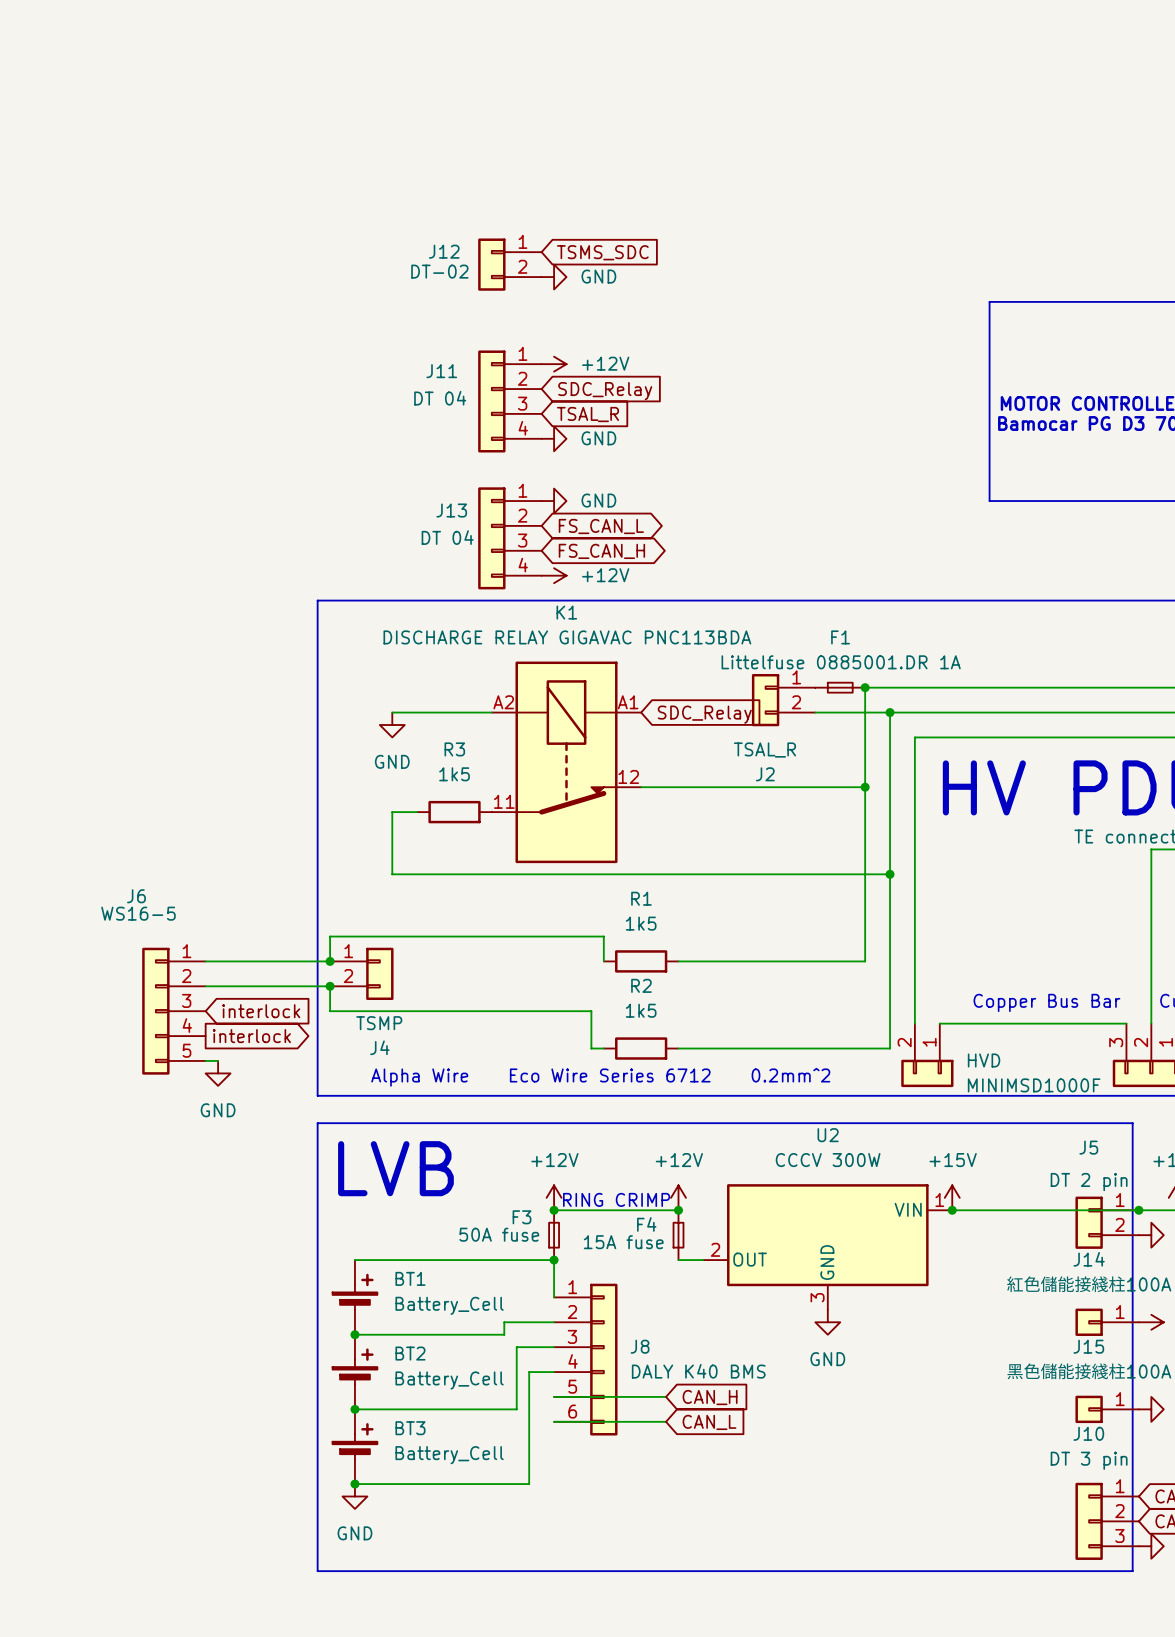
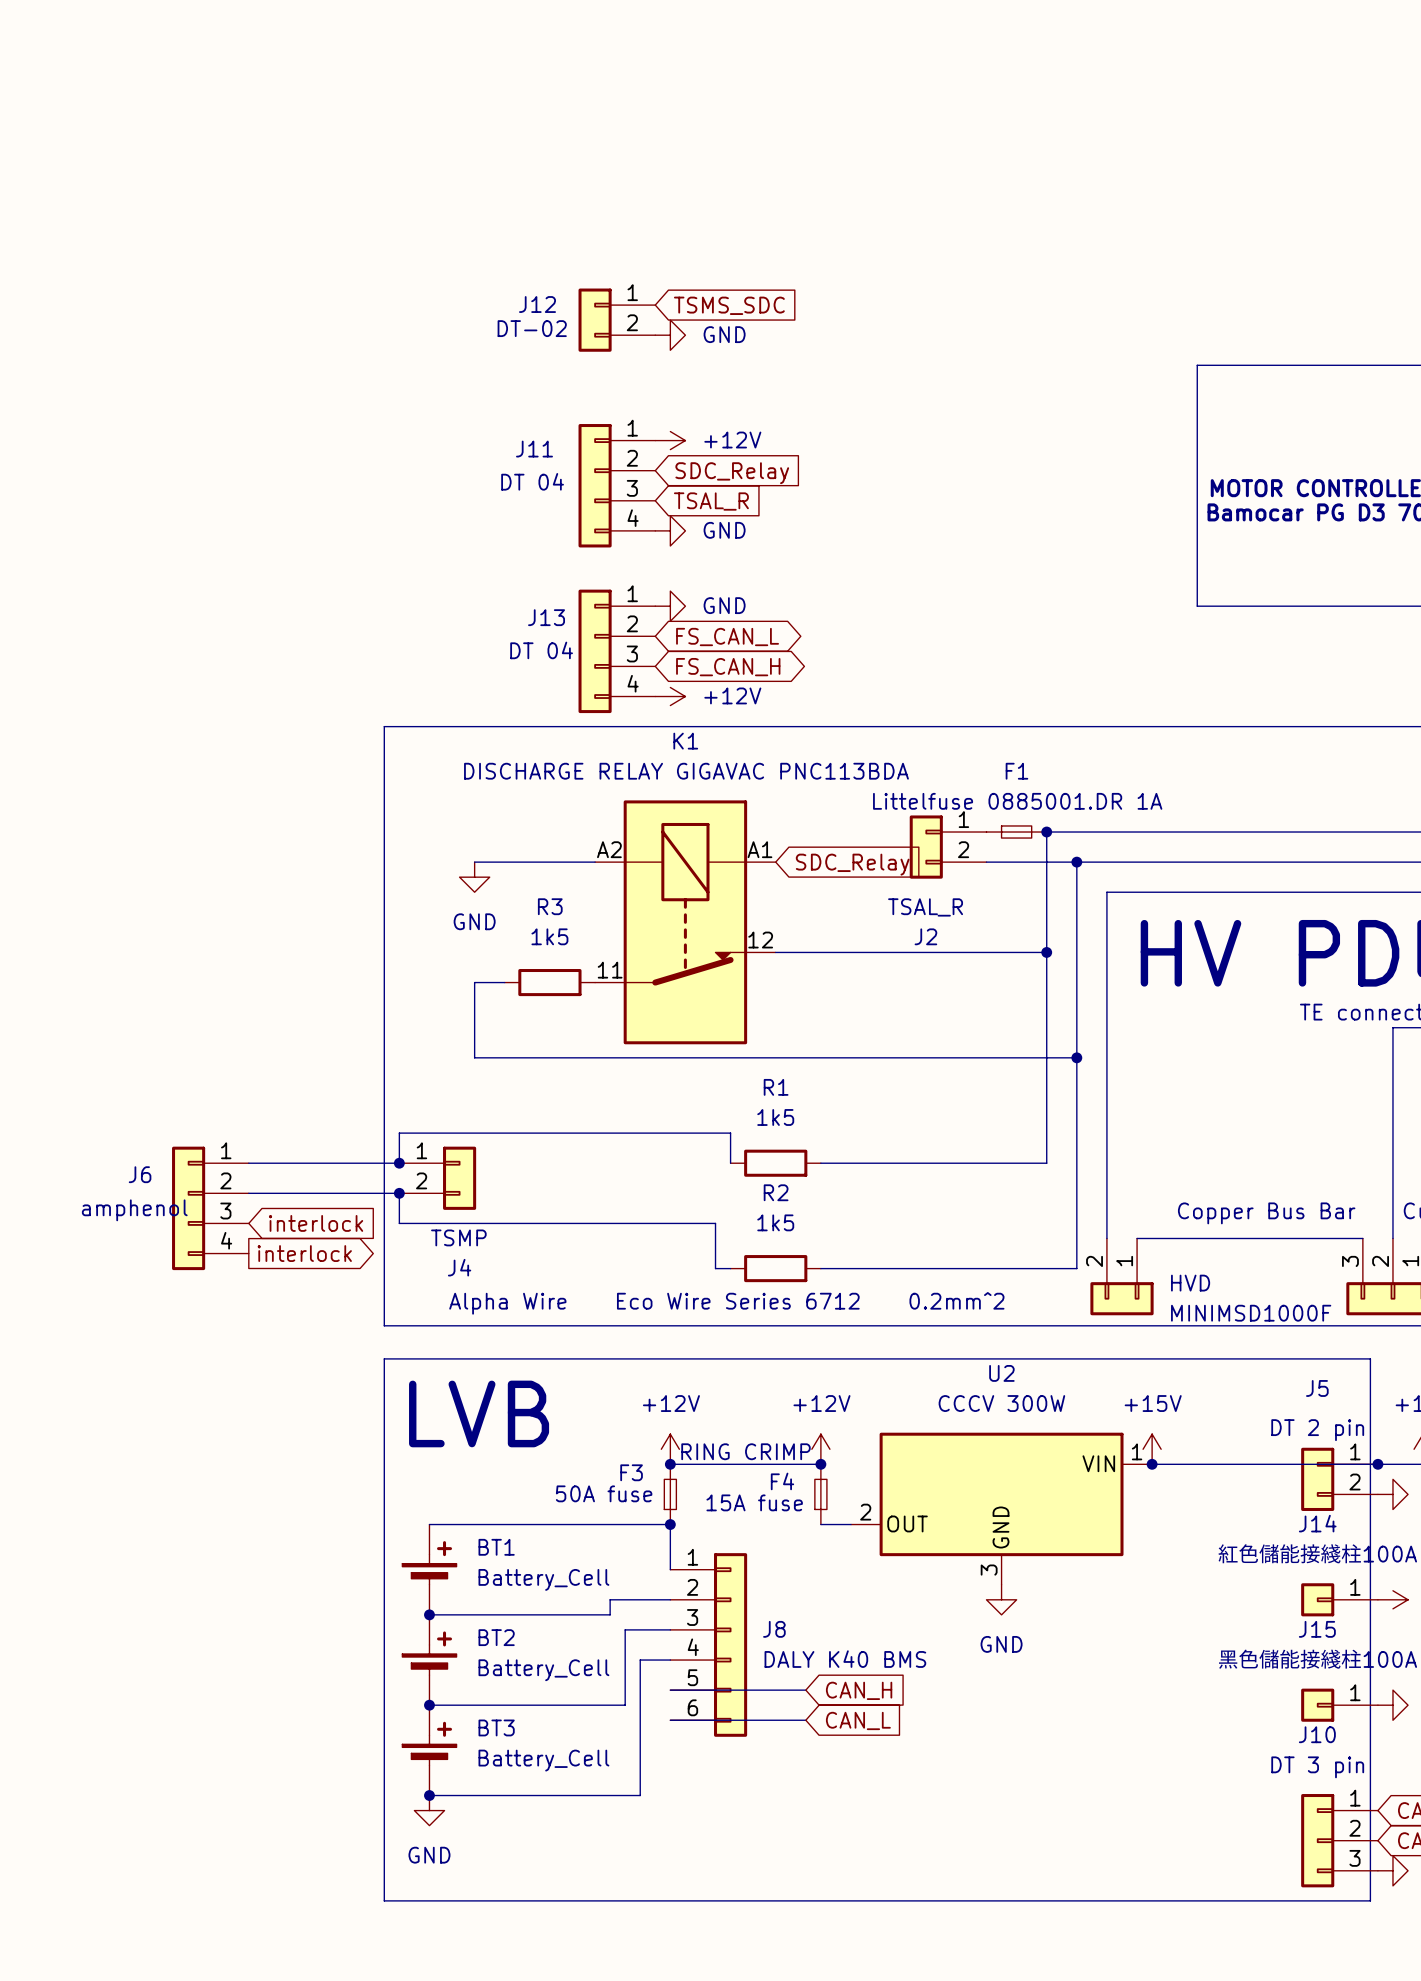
J6 name position: J6 (136, 896) -> J6 (140, 1174)
J6 value: WS16-5 (138, 913) -> amphenol (134, 1210)
J6 symbol: [142, 947, 206, 1075] -> [172, 1146, 249, 1271]
wire: (205, 1060) (218, 1060) -> none
power symbol: GND (218, 1073) -> none

